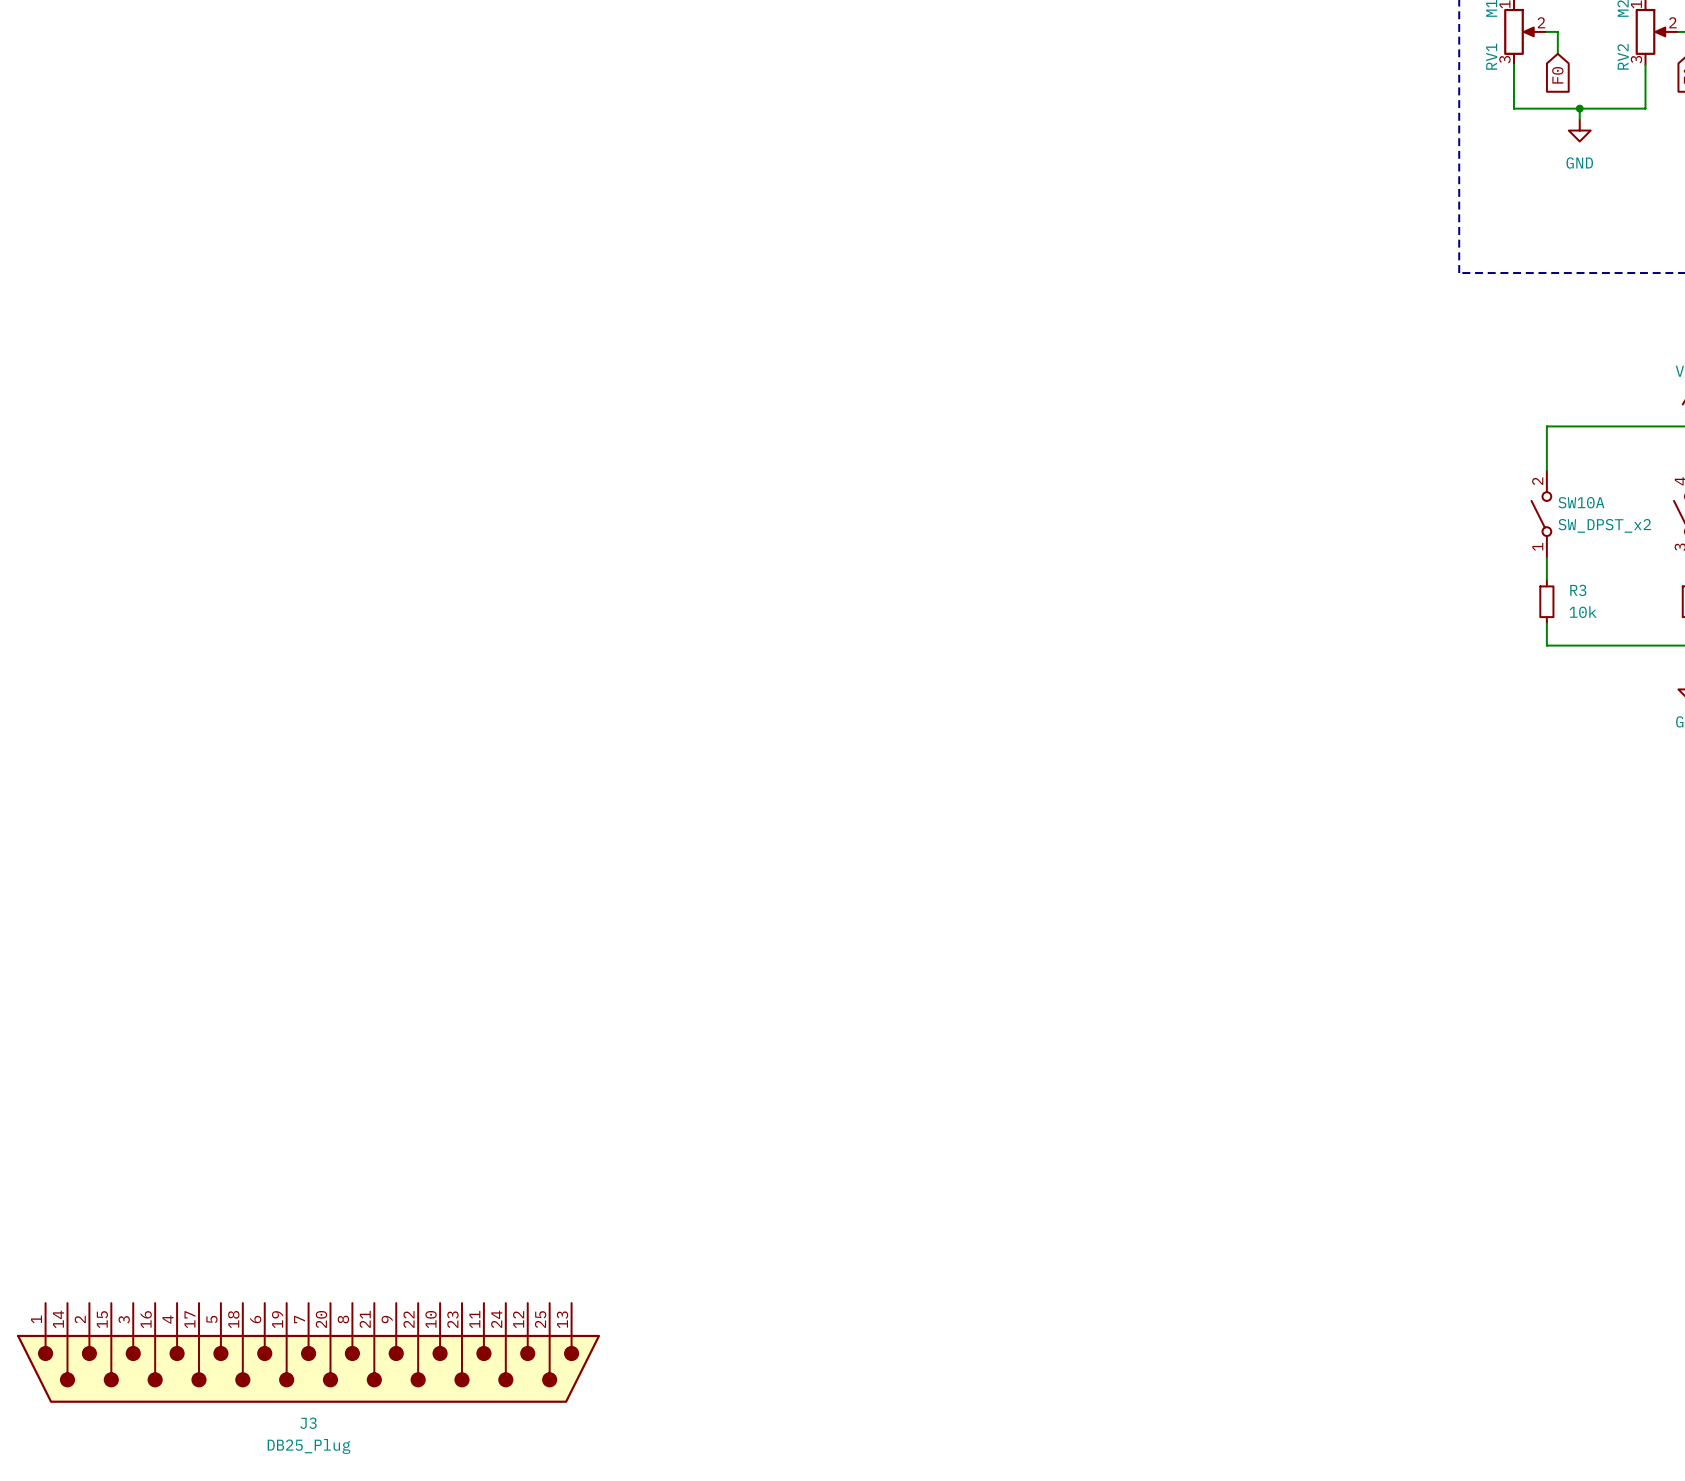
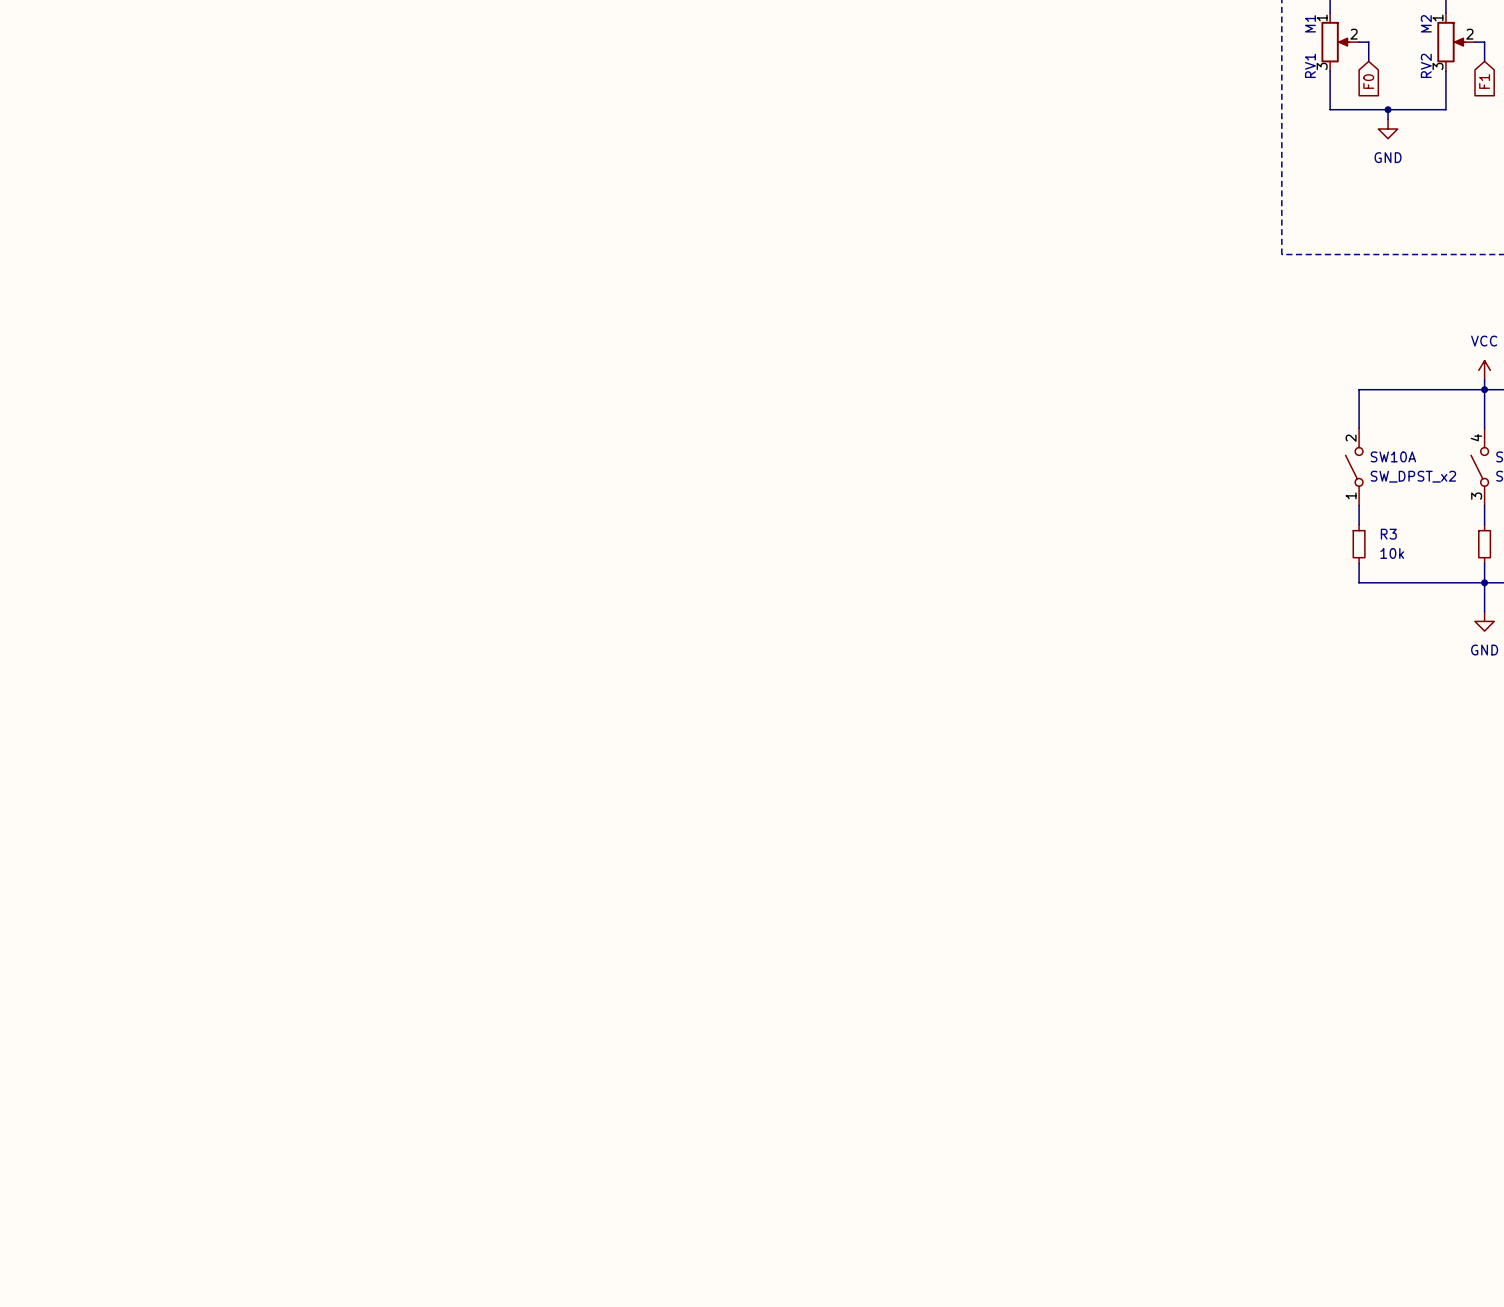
J3: DB25_Plug (308, 1352) -> none

